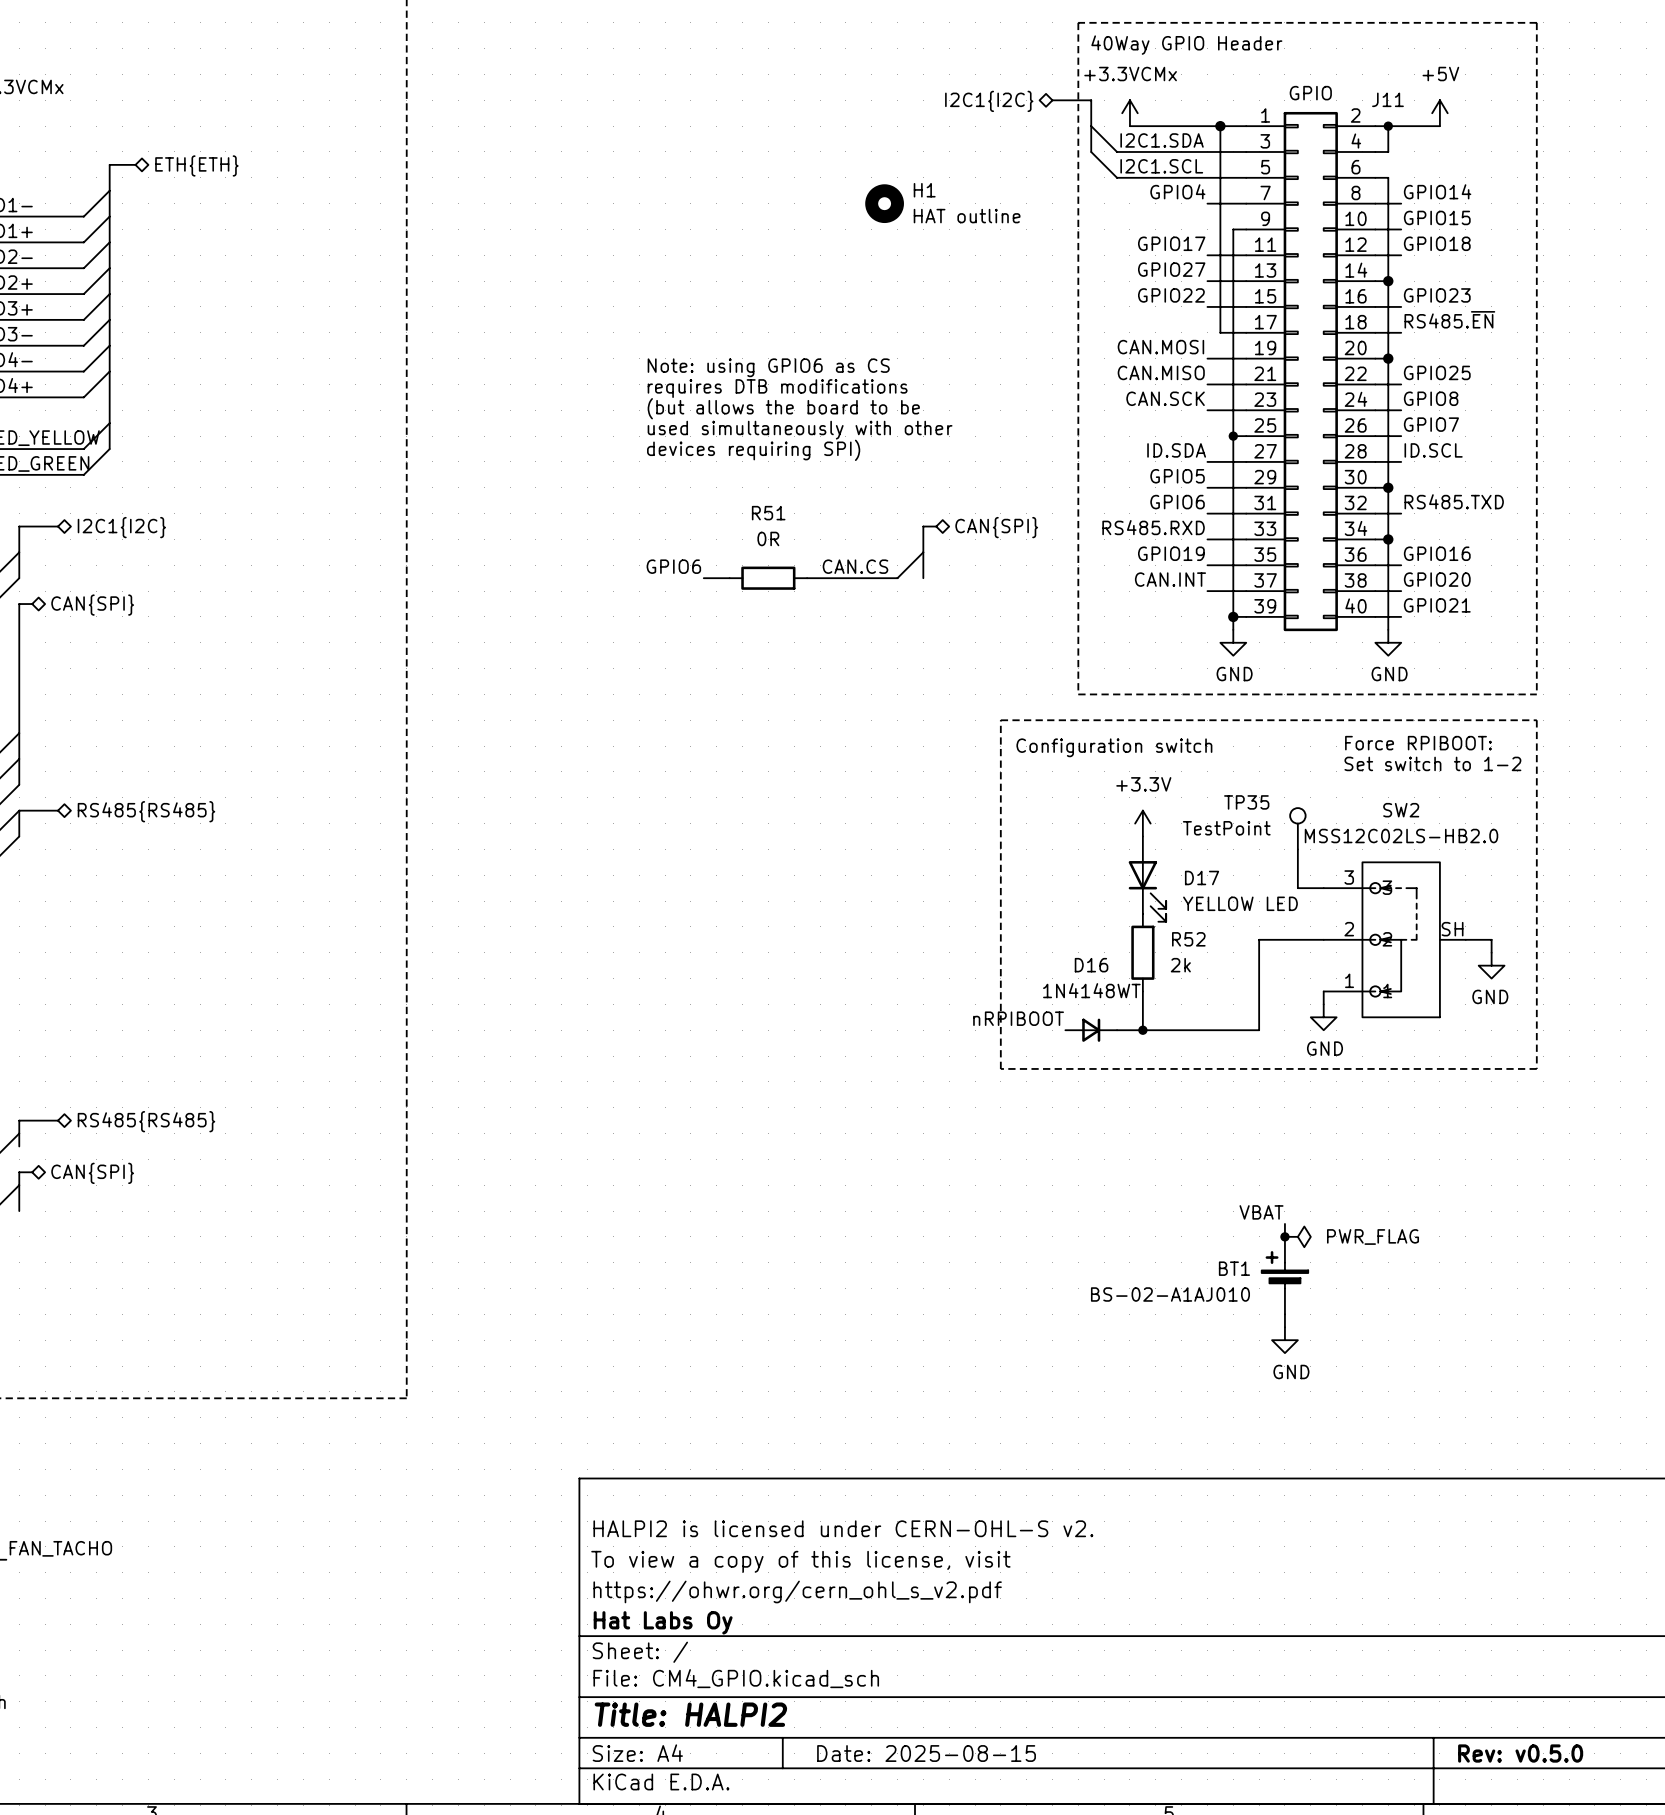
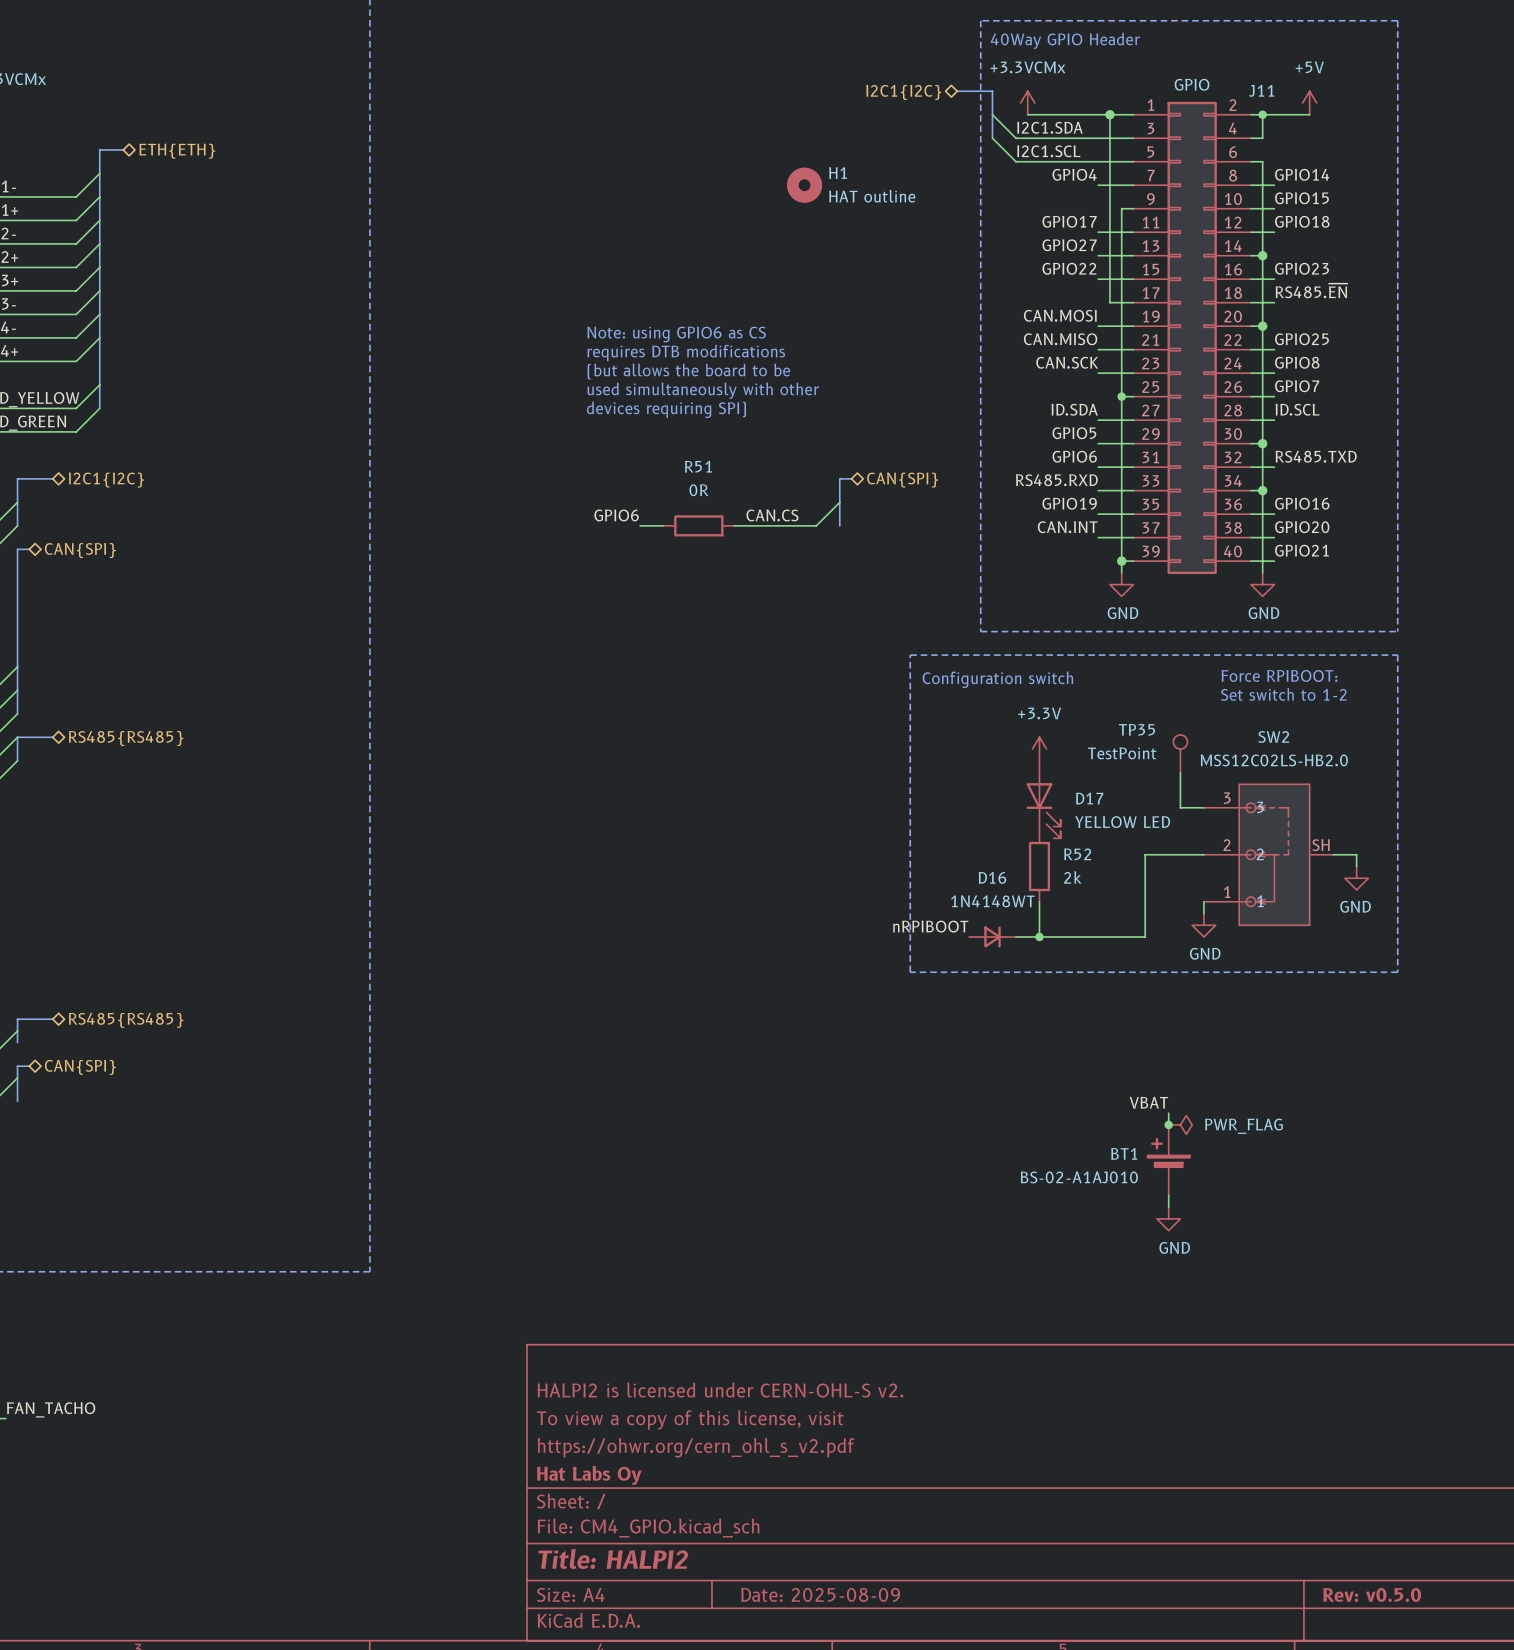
title block: Date: 2025-08-15 (926, 1753) -> Date: 2025-08-09 (820, 1594)

